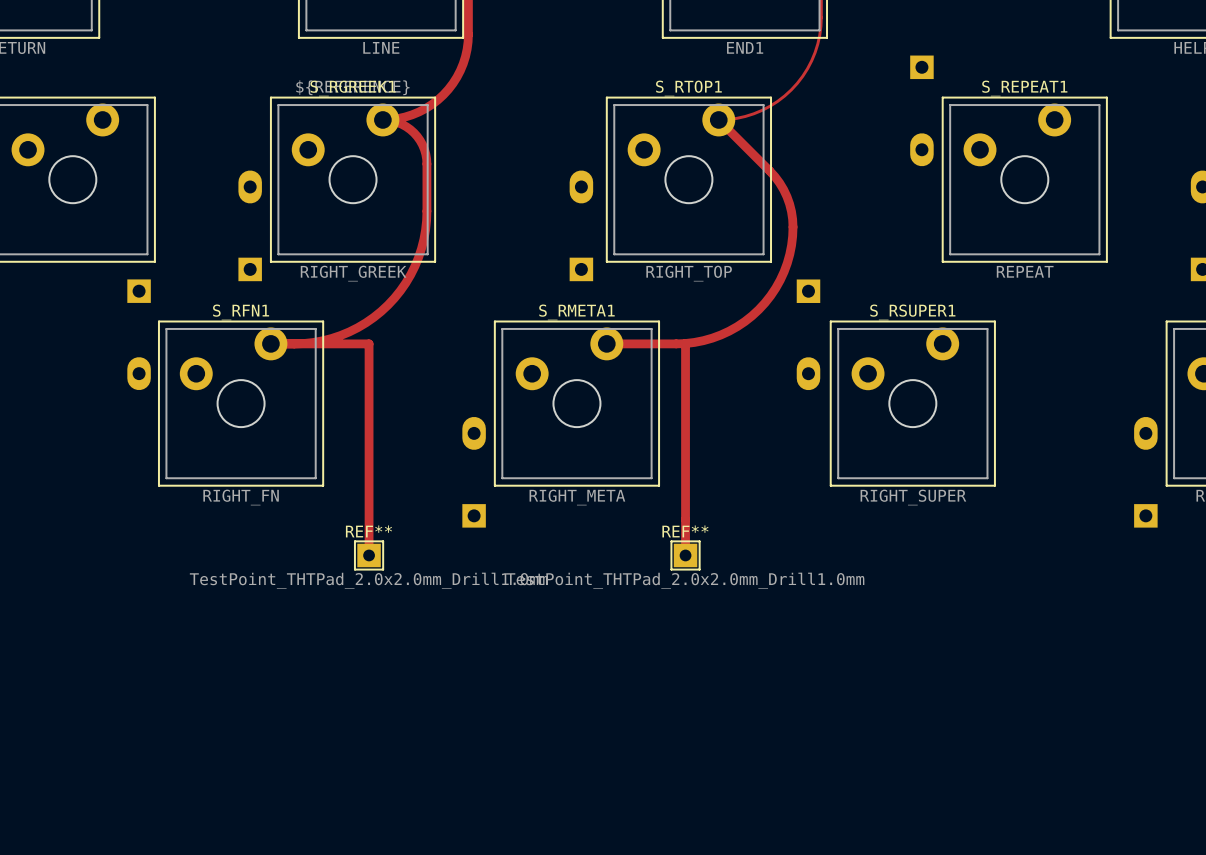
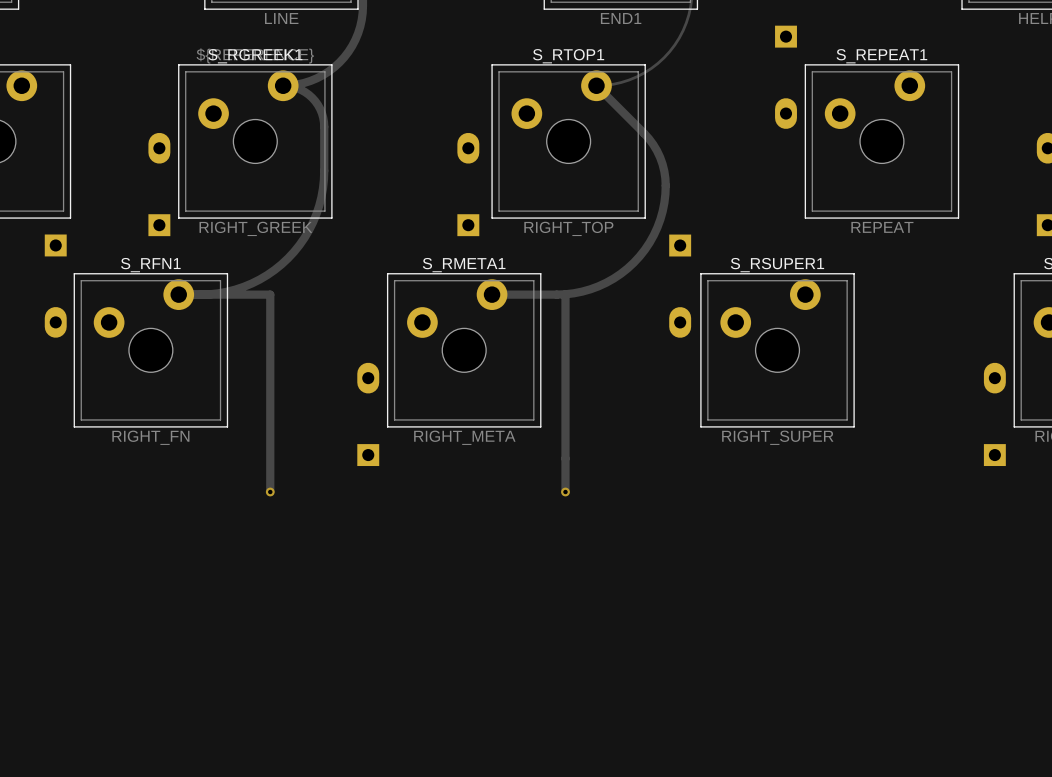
REF**: TestPoint_THTPad_2.0x2.0mm_Drill1.0mm (369, 555) -> none
REF**: TestPoint_THTPad_2.0x2.0mm_Drill1.0mm (685, 555) -> none

